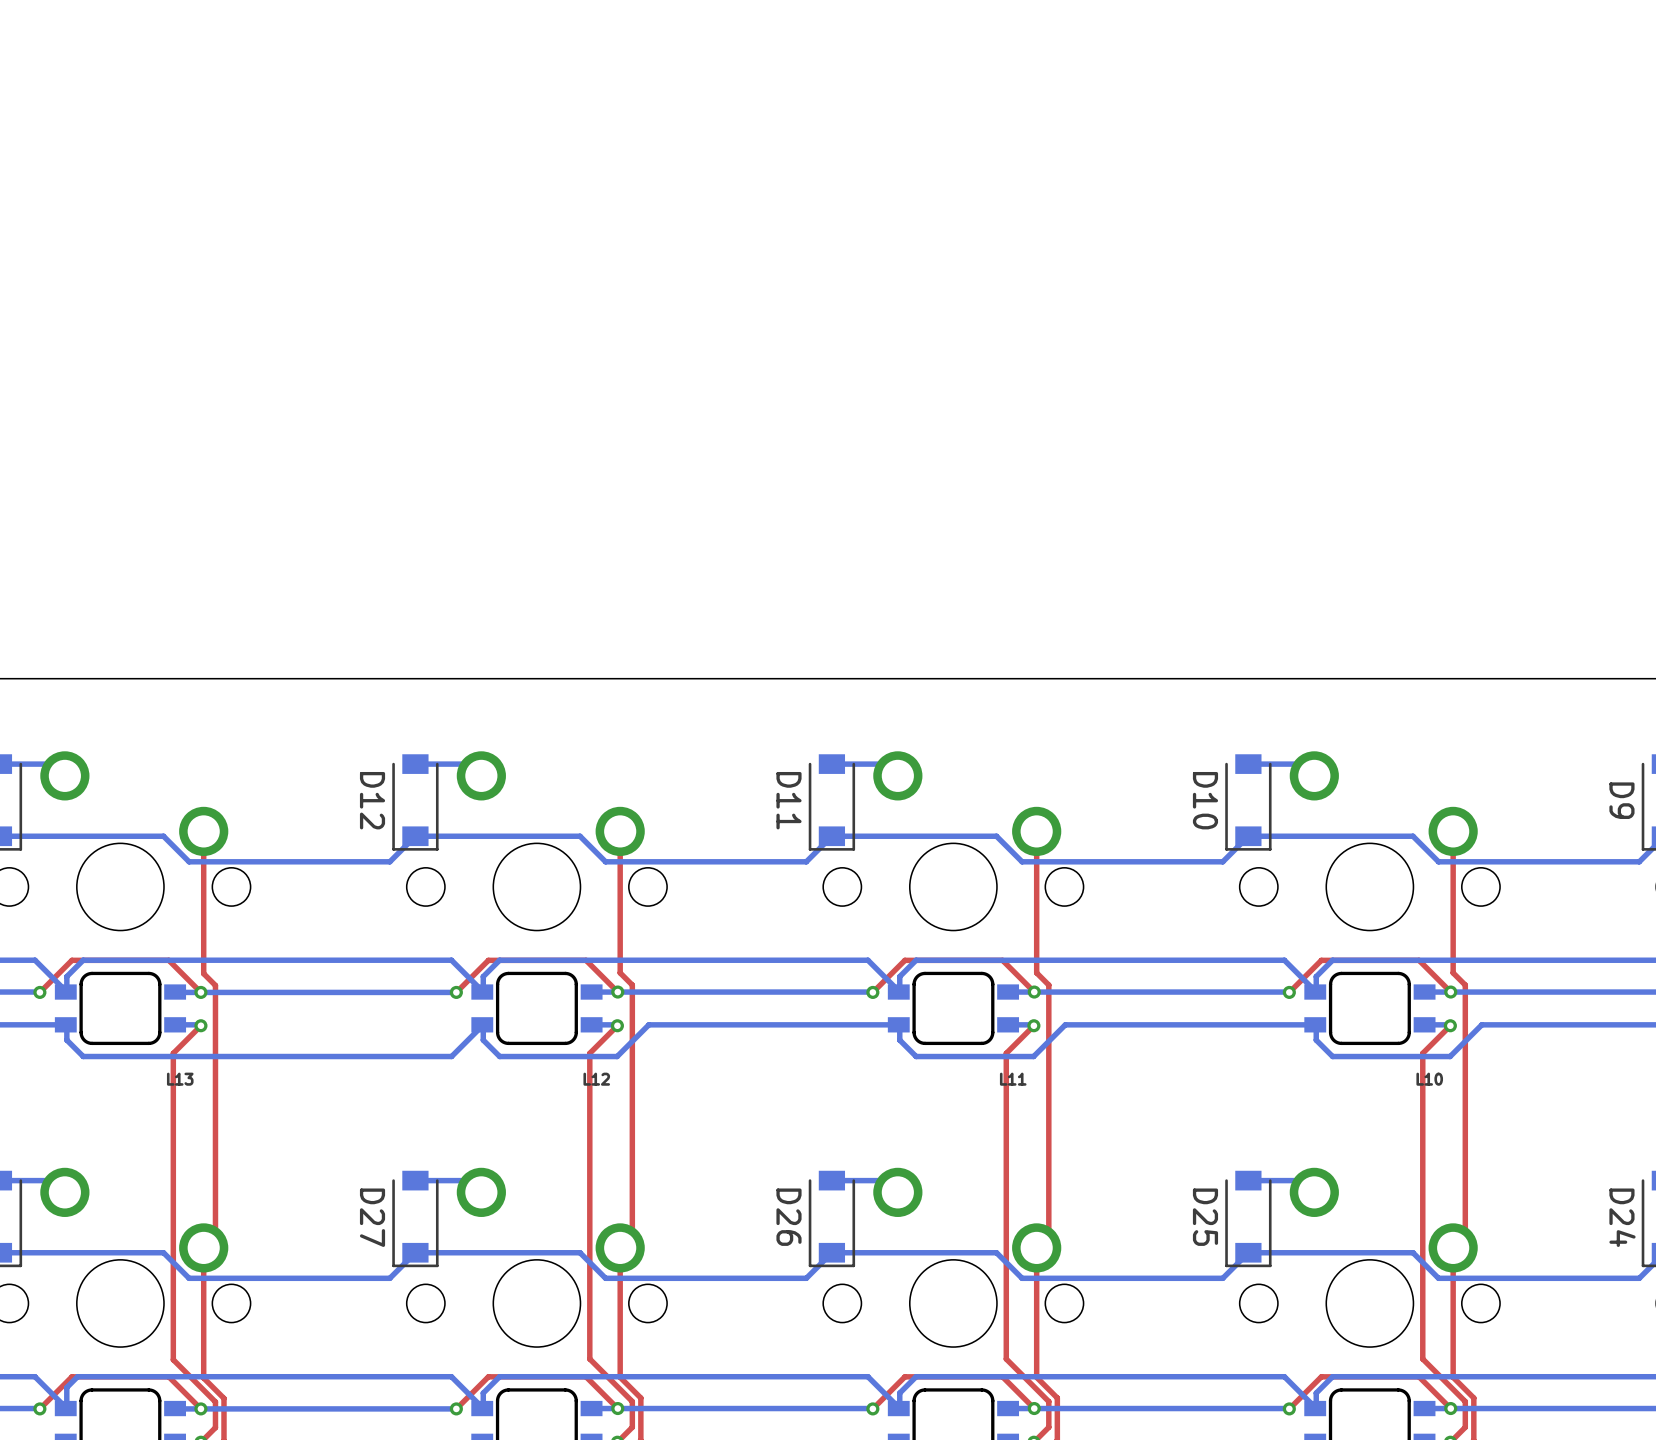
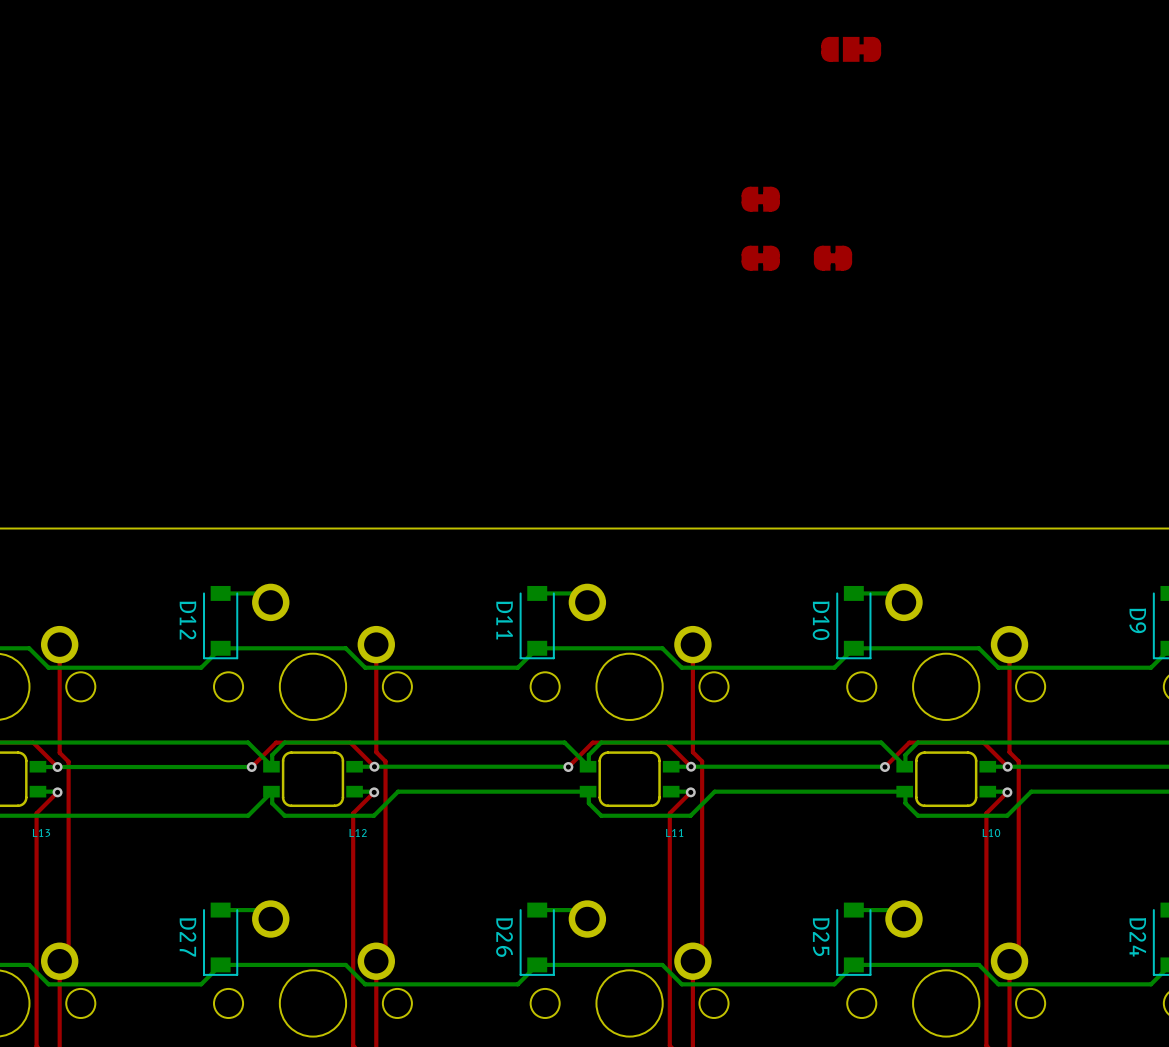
part: none -> (851, 49)
part: none -> (760, 199)
part: none -> (760, 258)
part: none -> (833, 258)

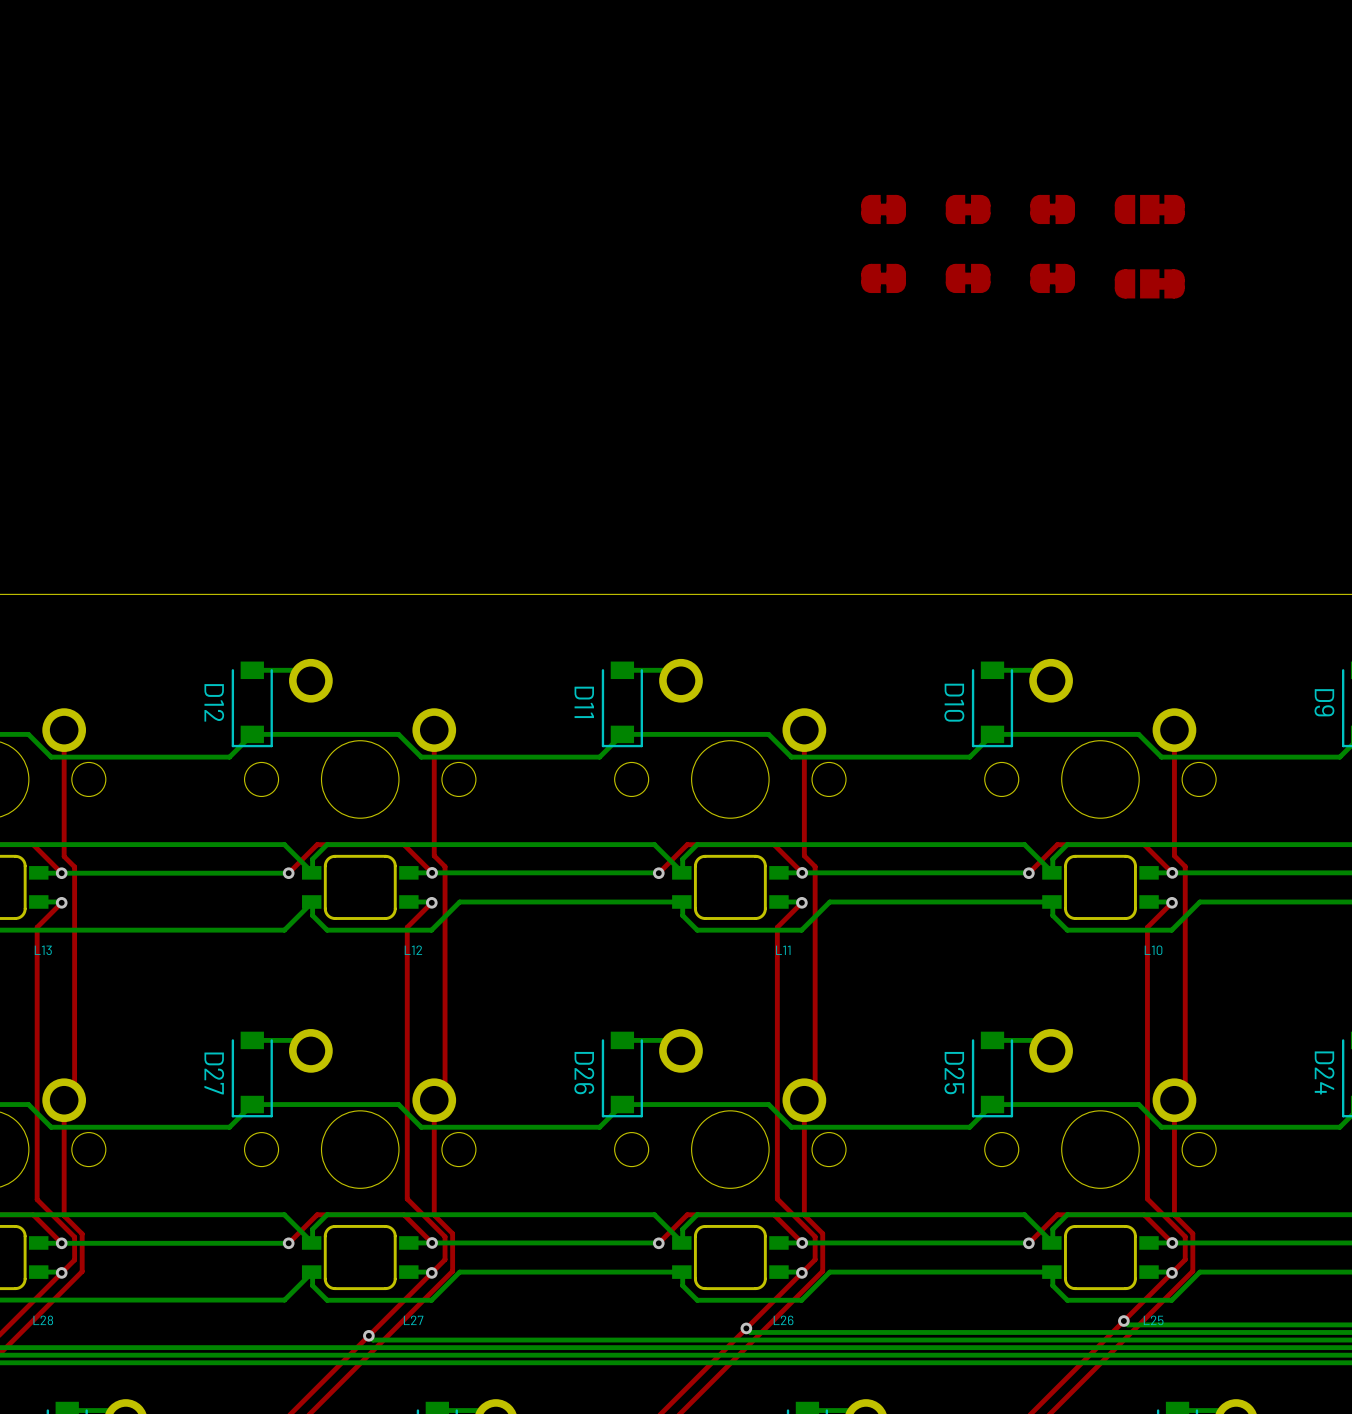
part: (851, 49) -> none
part: none -> (968, 209)
part: none -> (1052, 209)
part: none -> (1149, 209)
part: none -> (1052, 278)
part: none -> (1149, 283)

